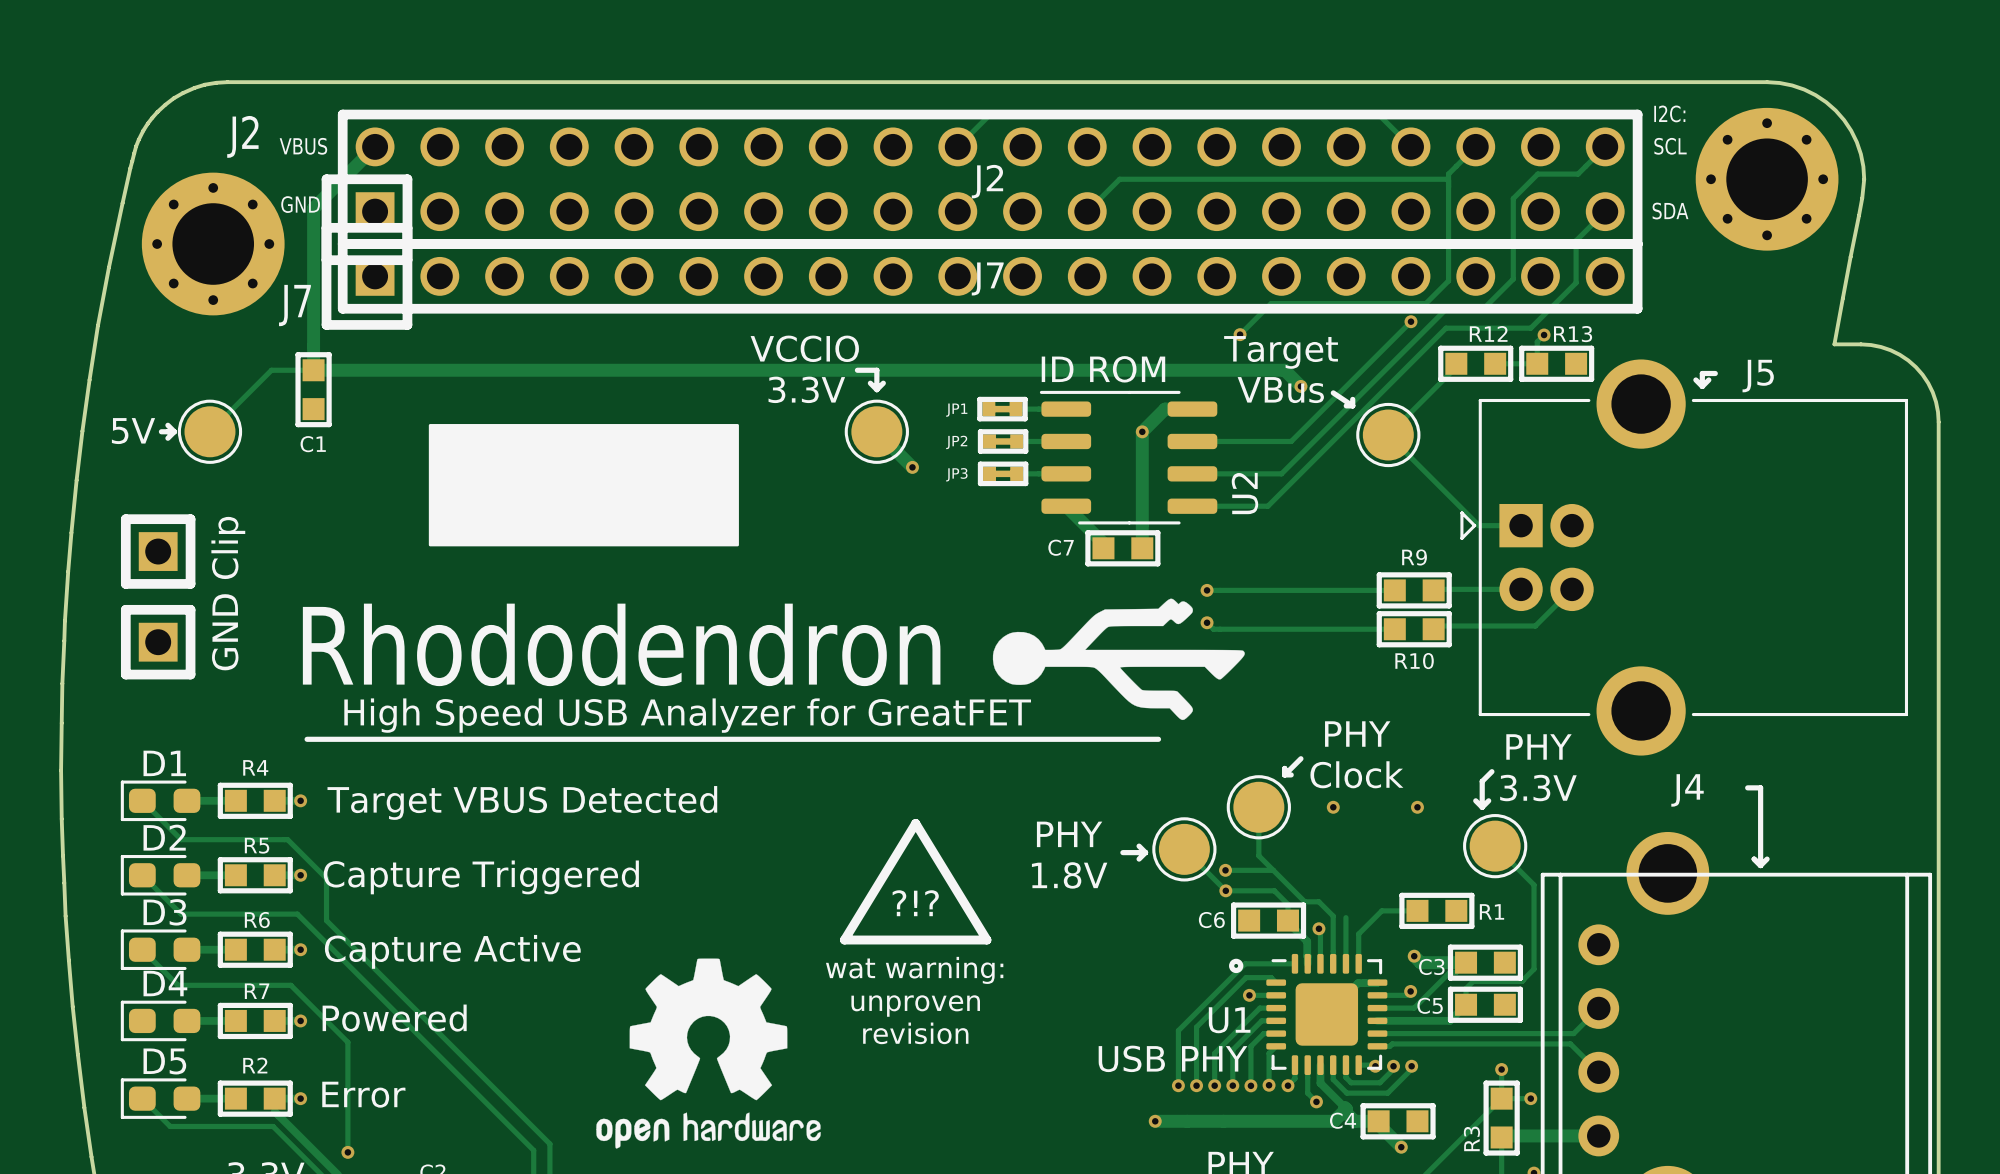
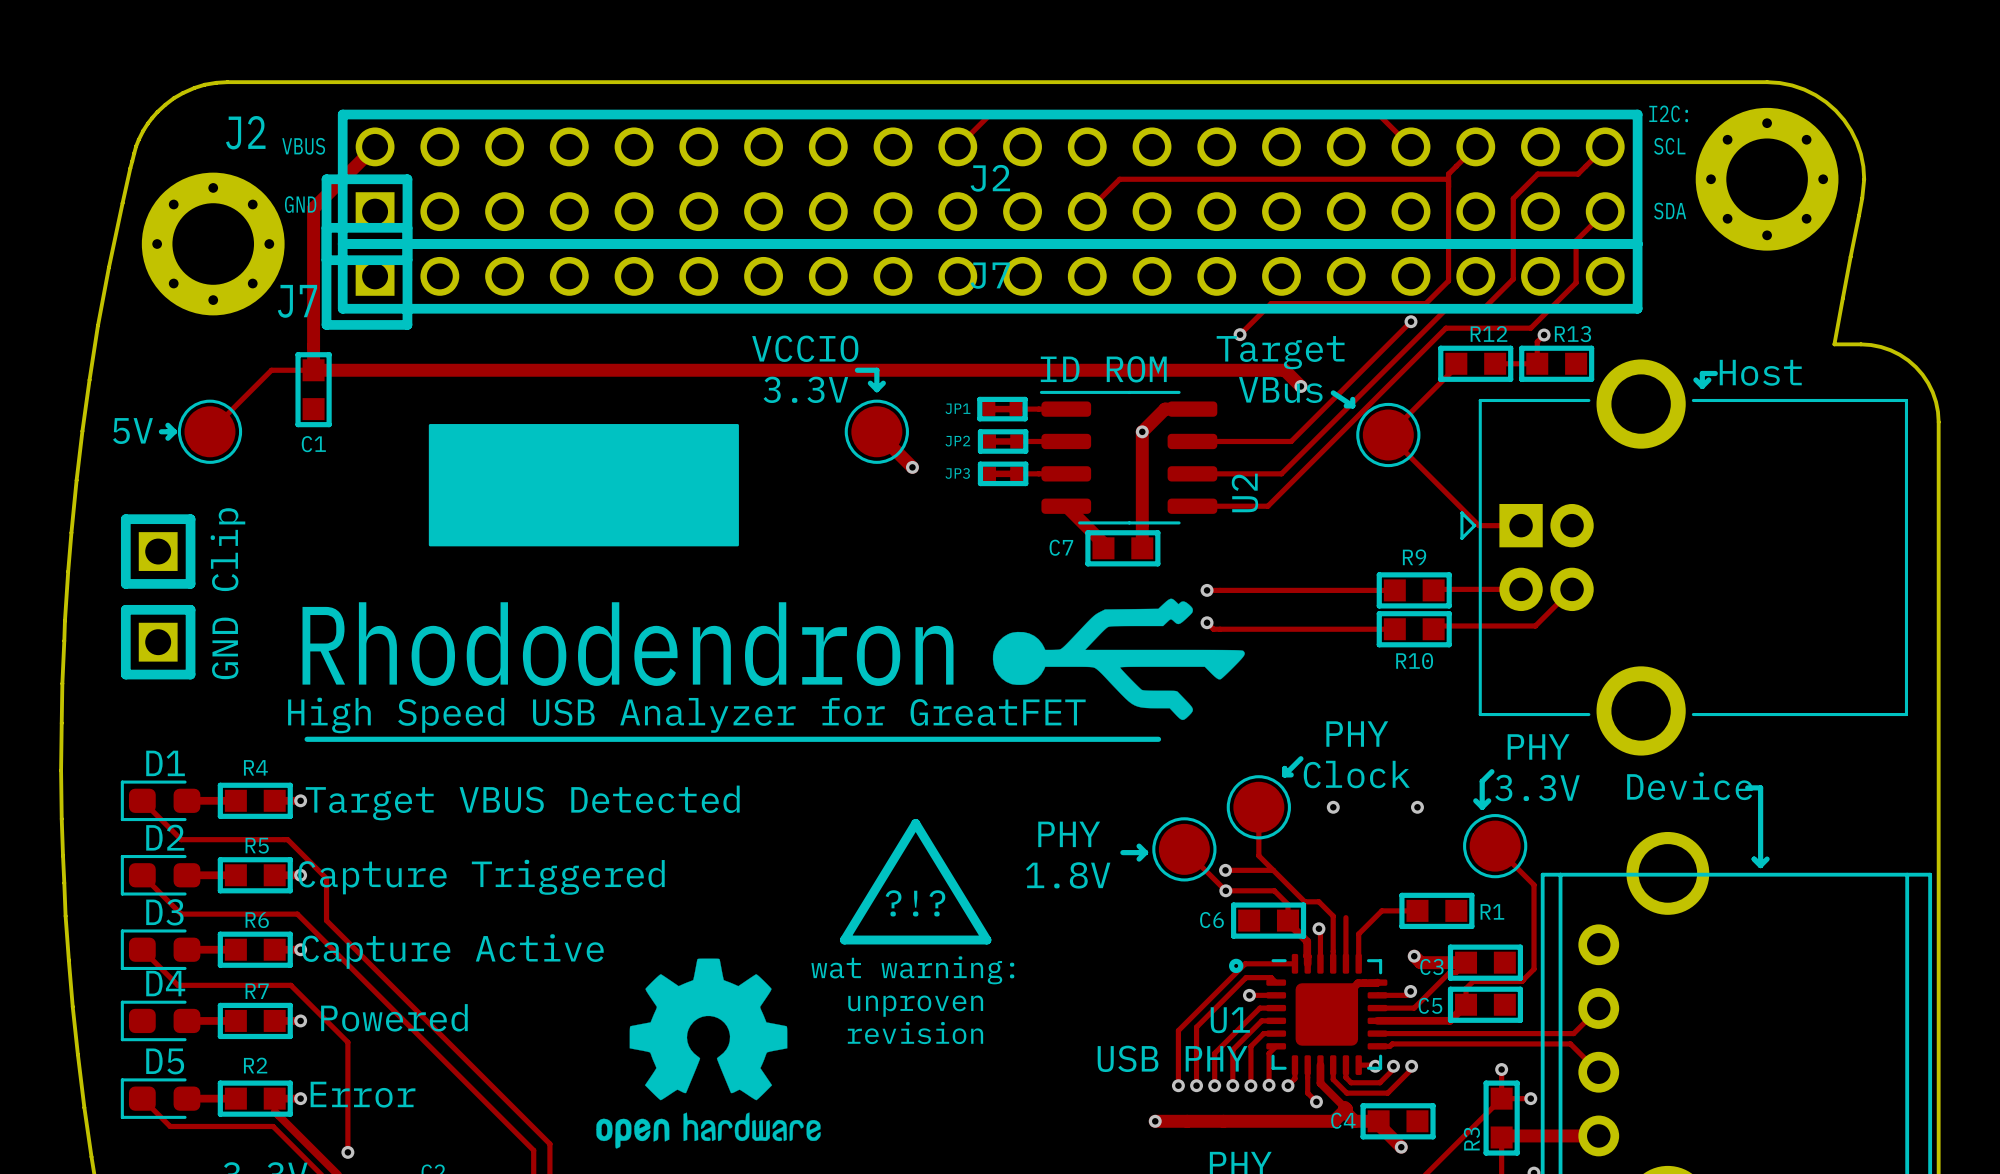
J5 name: J5 (1758, 376) -> Host (1760, 372)
J4 name: J4 (1687, 790) -> Device (1689, 786)

